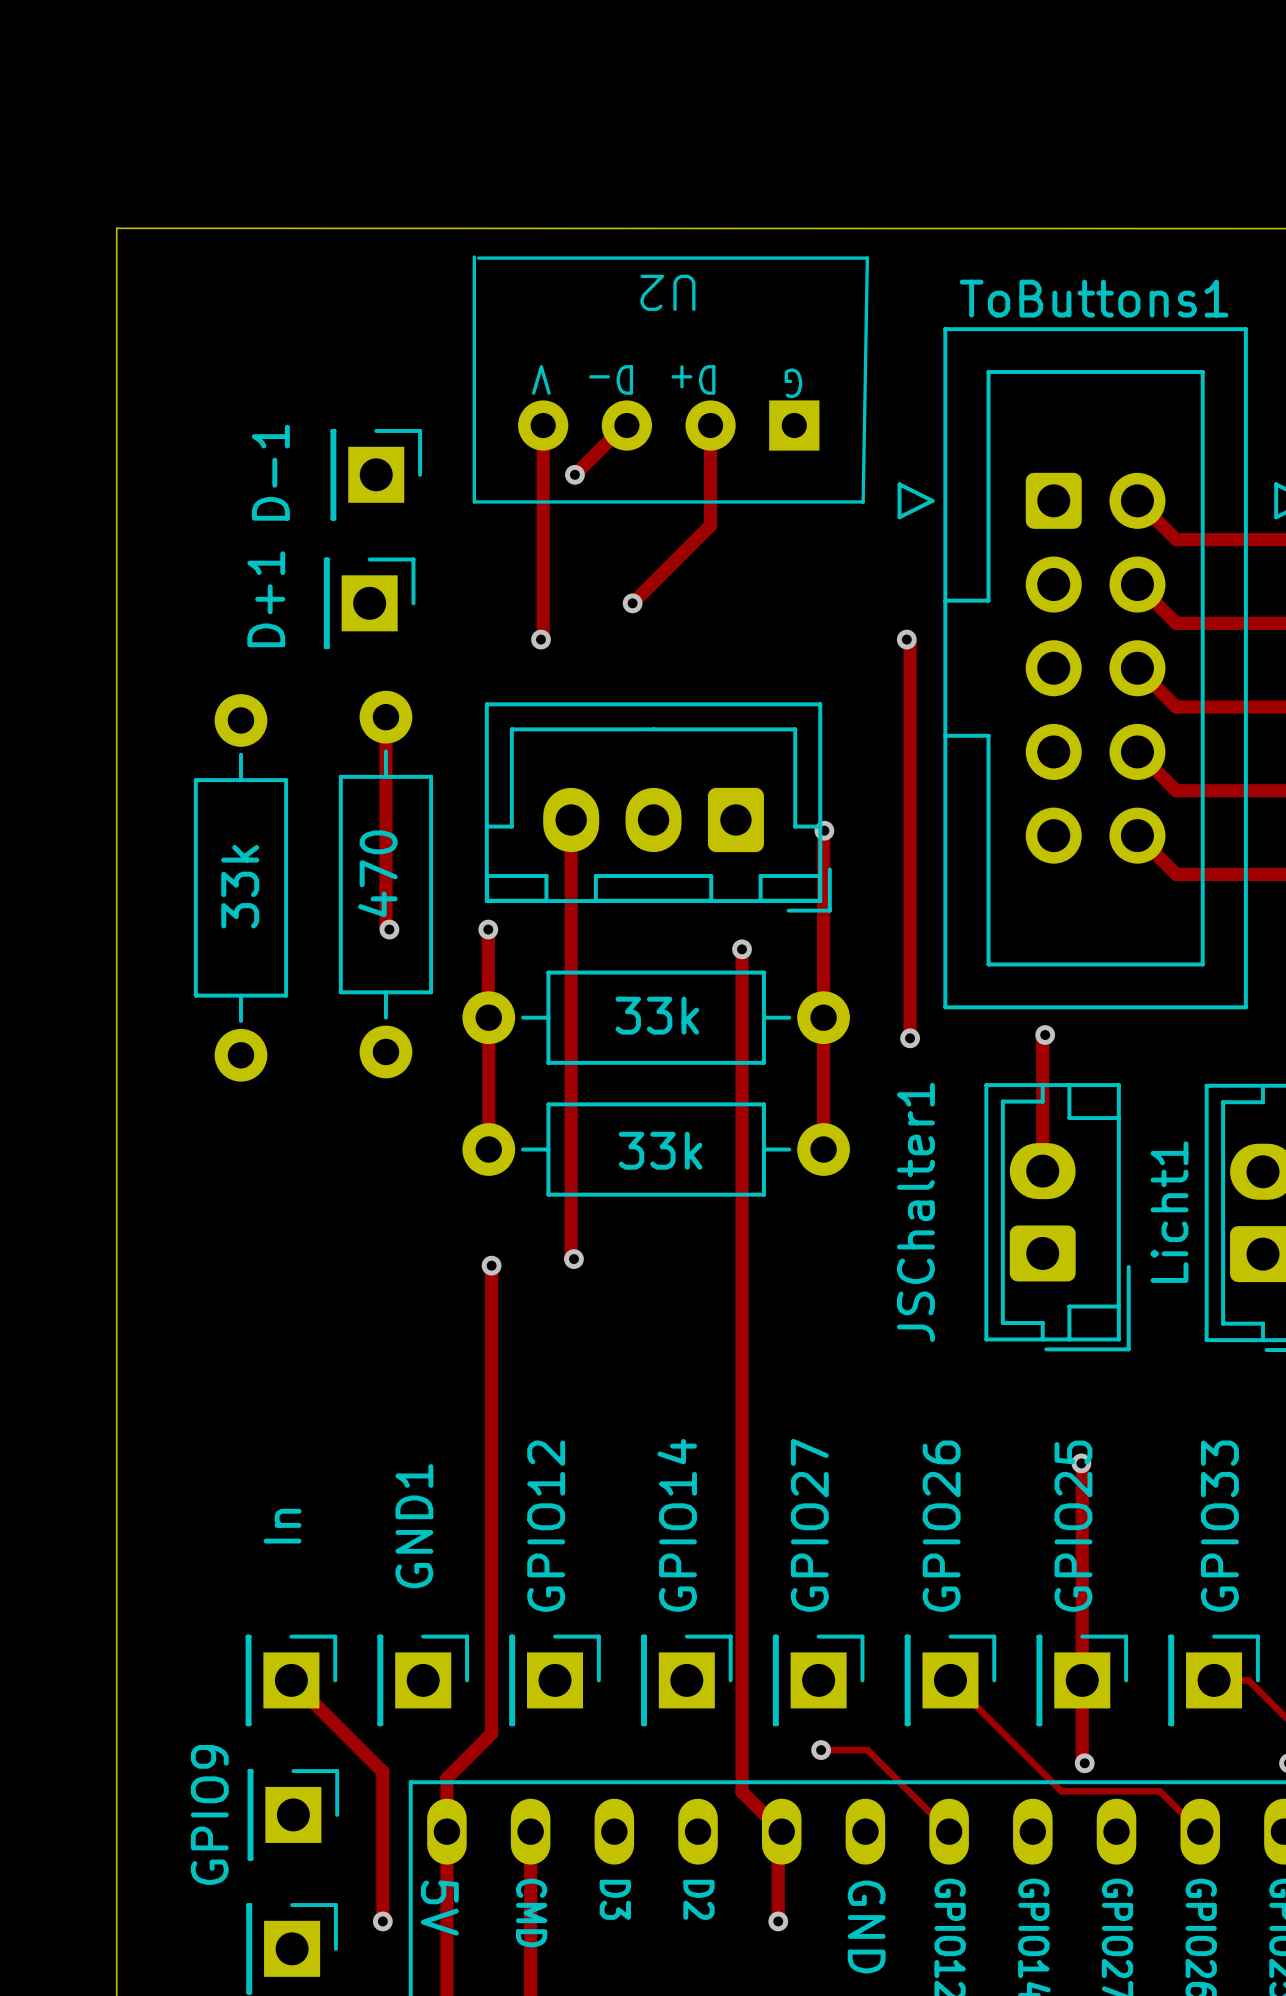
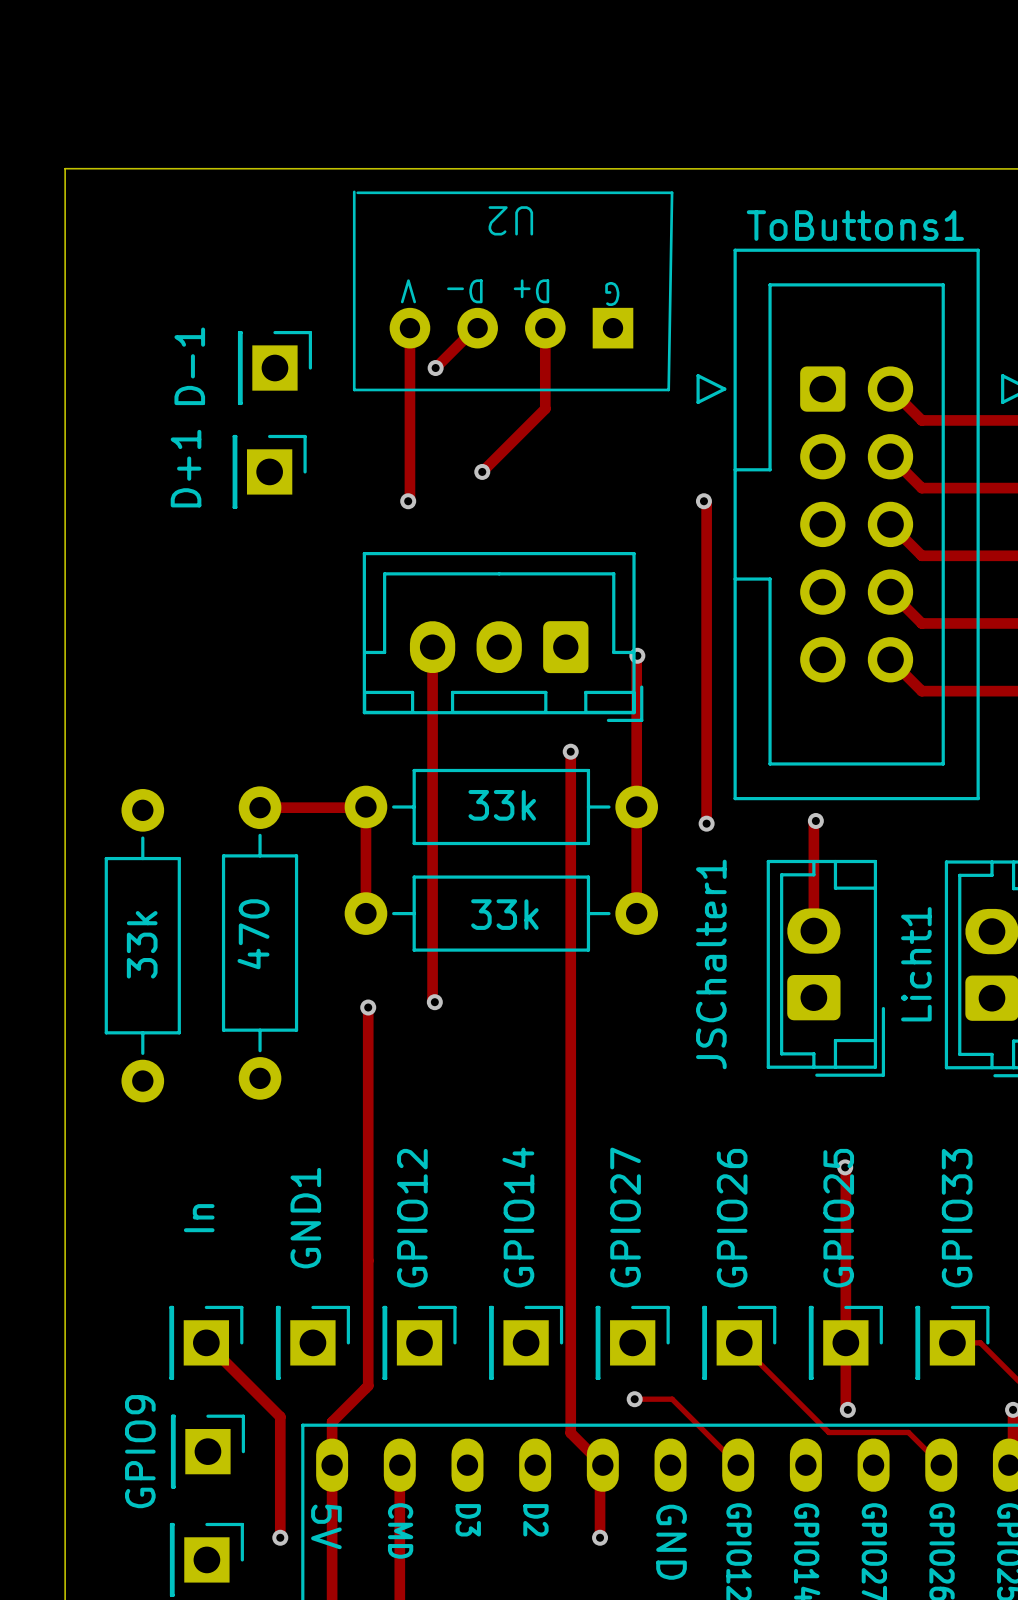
track: (385, 717) (385, 926) (389, 929) -> none
text position: 470 (377, 873) -> 470 (253, 934)
part: (385, 884) -> none
text position: 33k (240, 886) -> 33k (142, 944)
part: (240, 887) -> none
via: (389, 929) -> none
track: (488, 929) (488, 1017) -> (260, 807) (365, 807)
via: (488, 929) -> none
part: none -> (260, 943)
part: none -> (142, 945)

